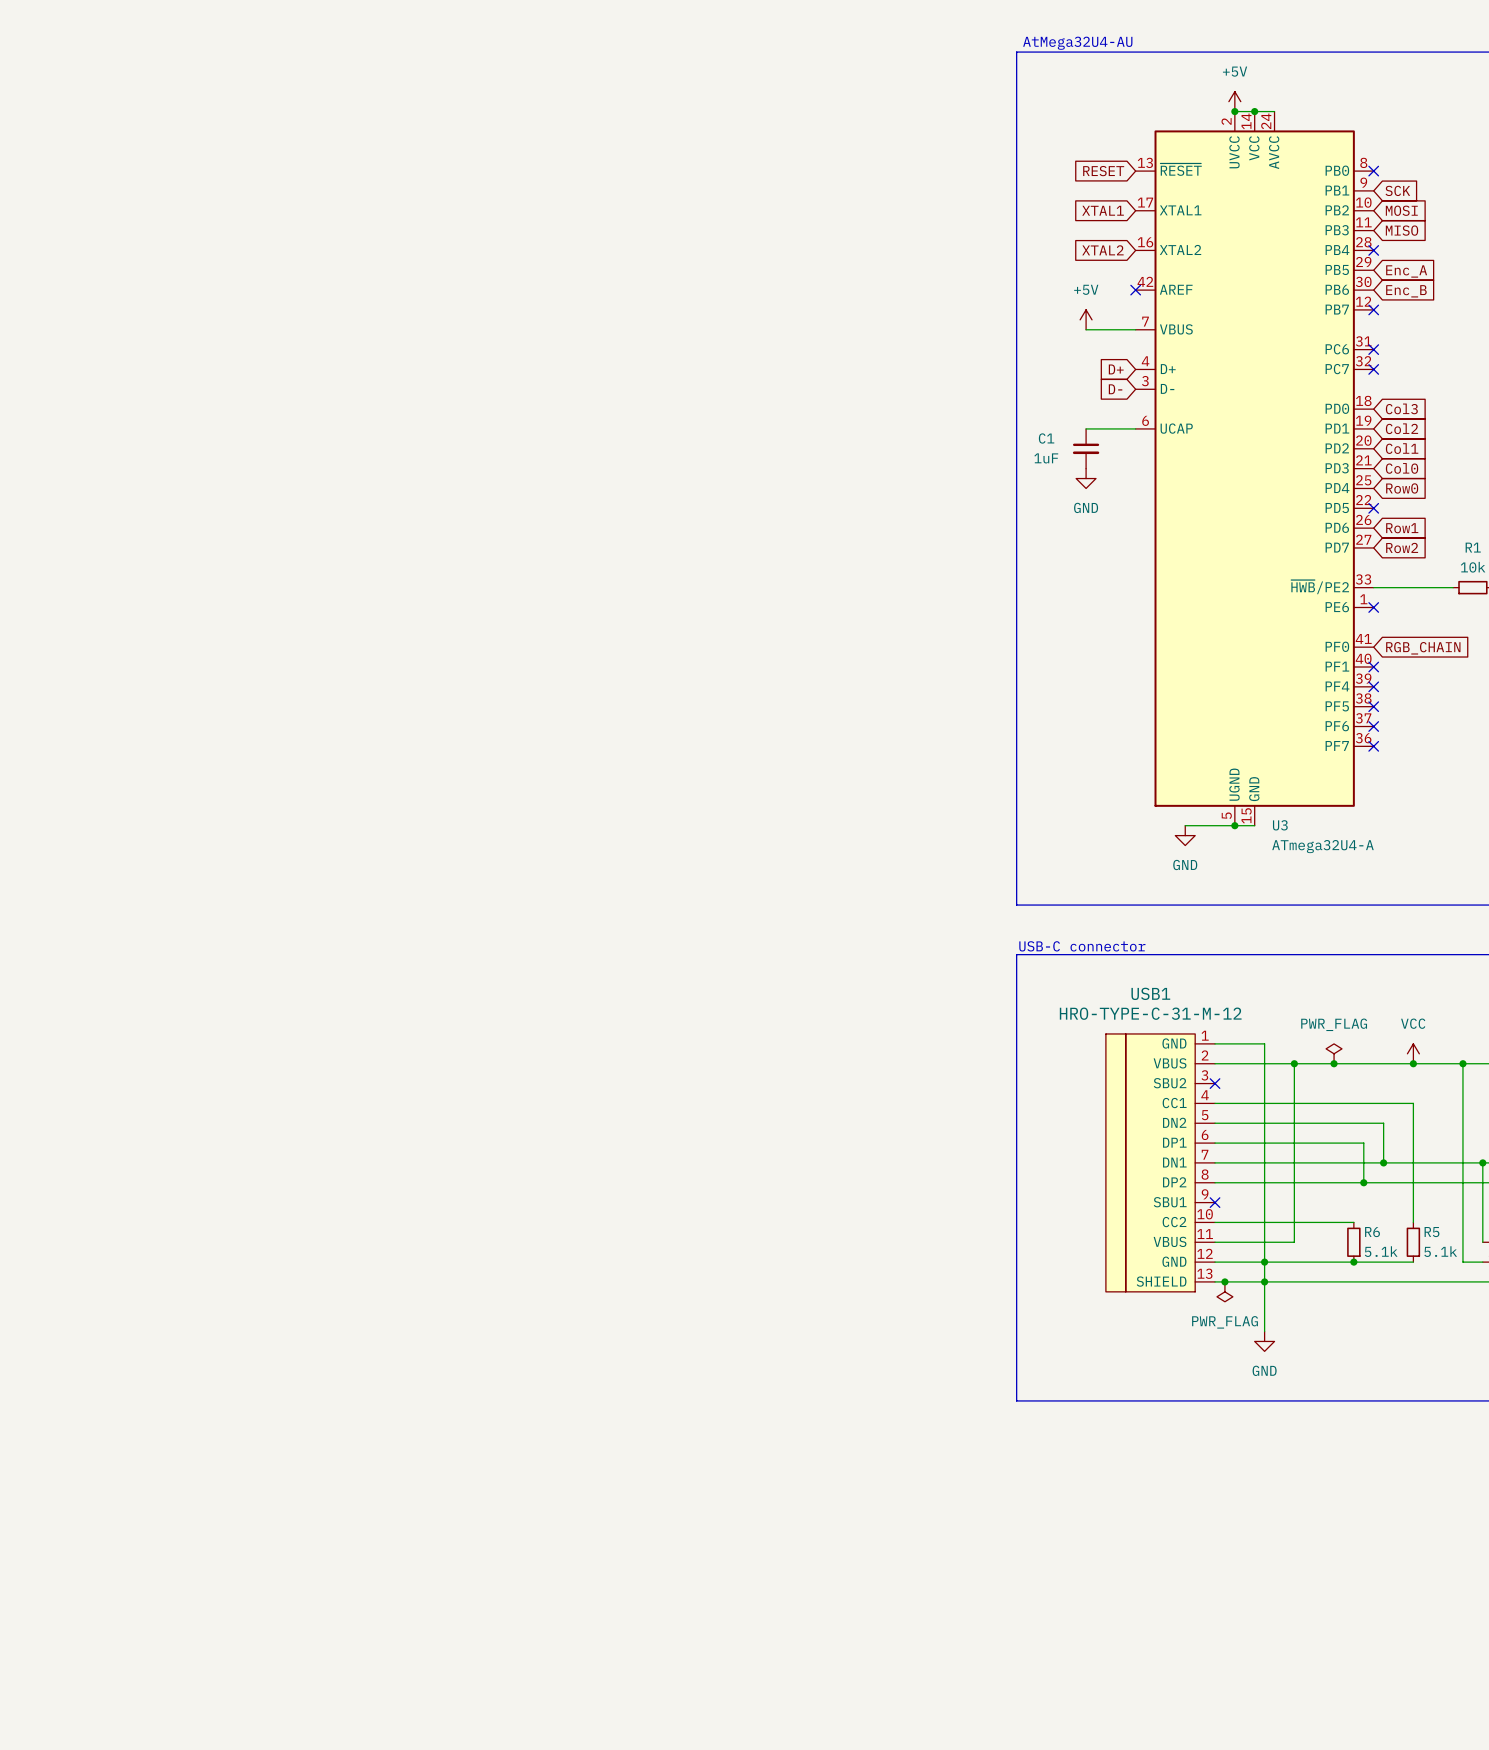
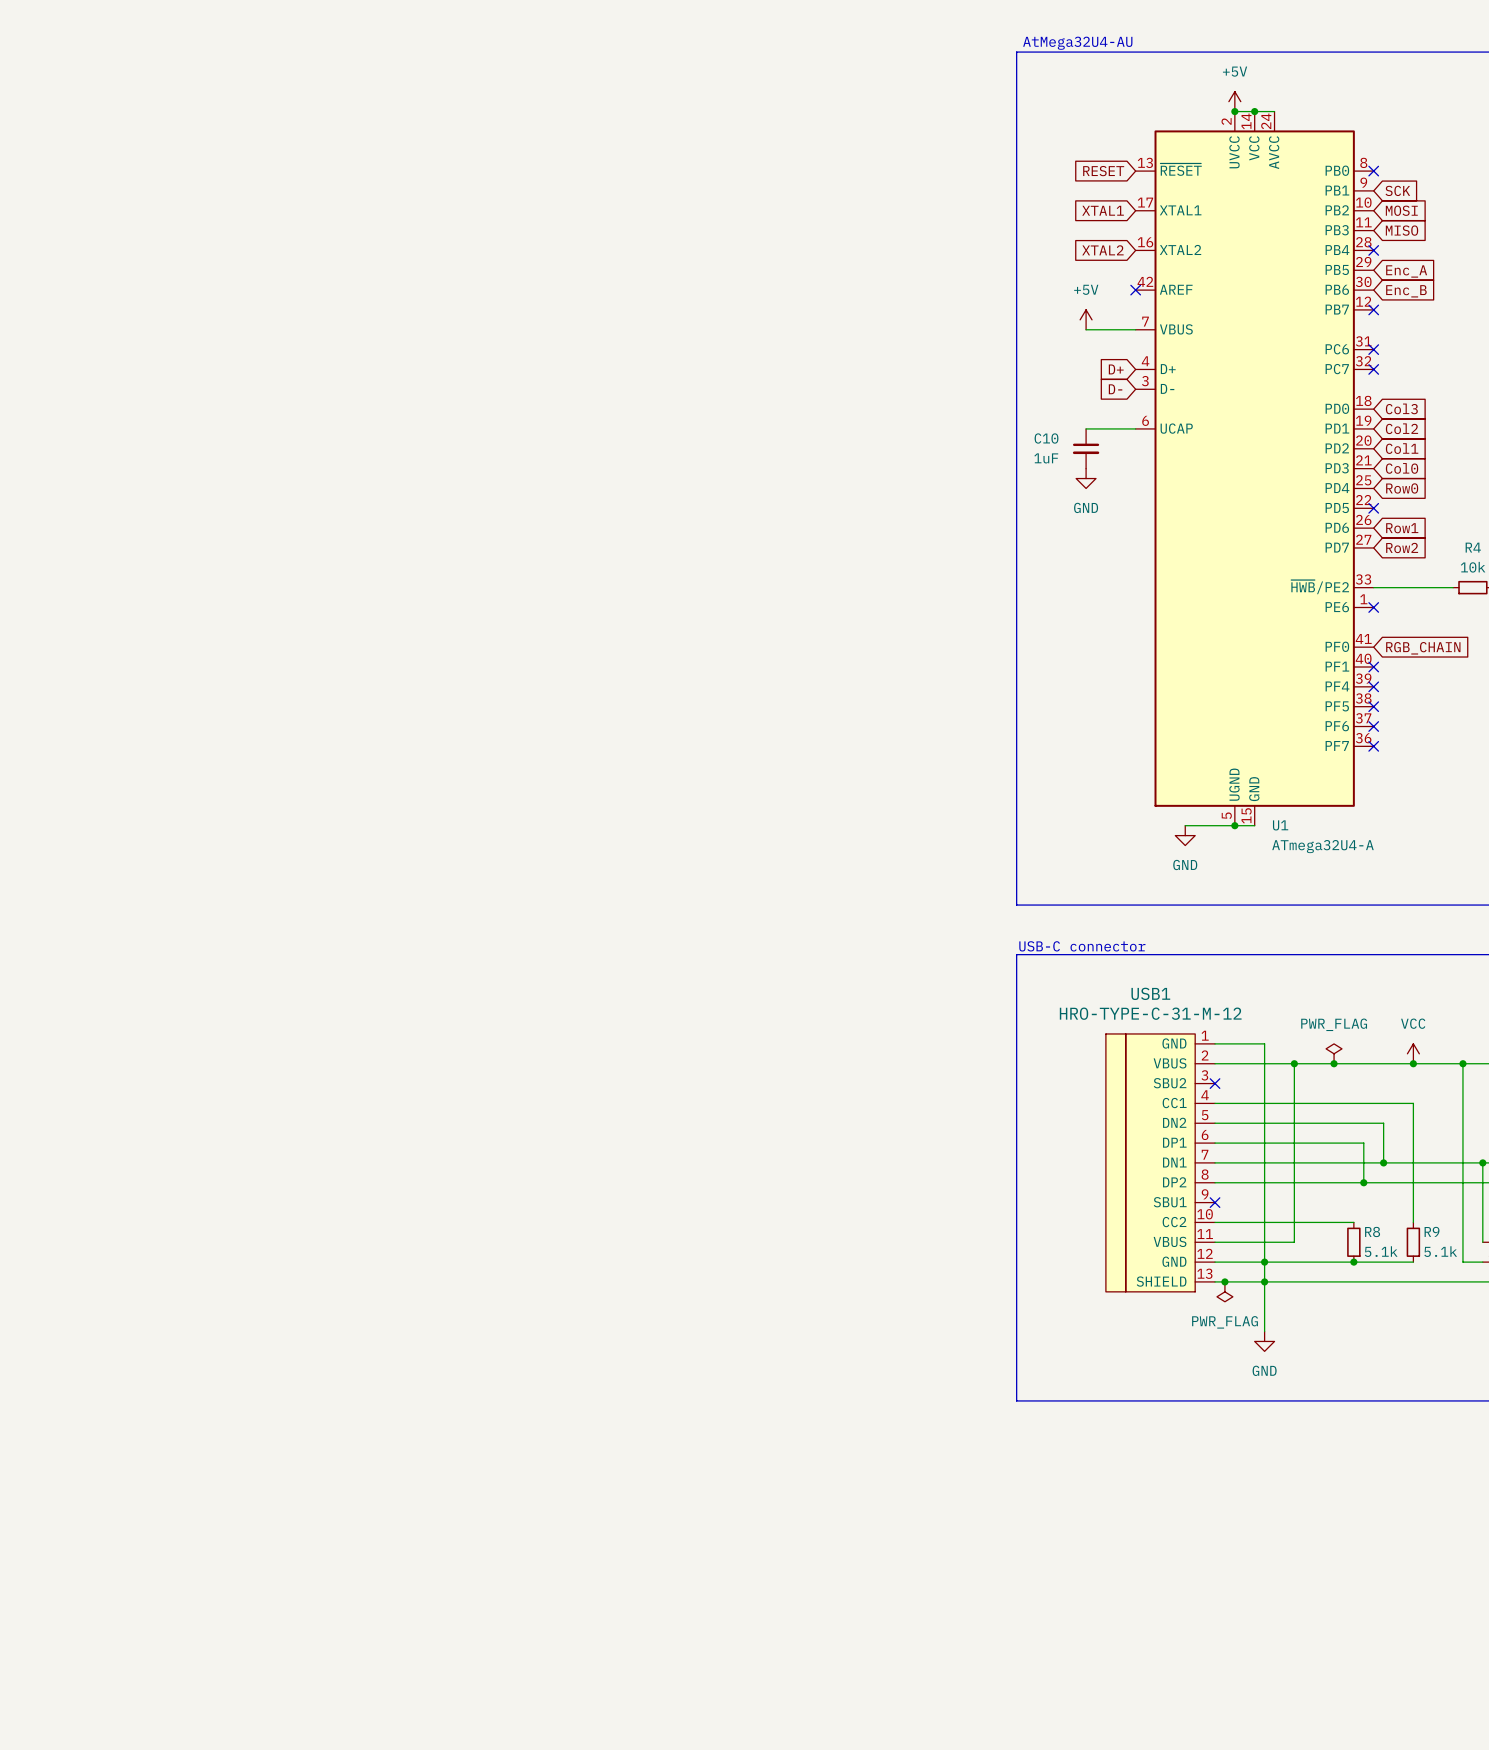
C1 name: C1 (1046, 438) -> C10 (1046, 438)
R1 name: R1 (1473, 547) -> R4 (1473, 547)
U3 name: U3 (1280, 825) -> U1 (1280, 825)
R6 name: R6 (1372, 1232) -> R8 (1372, 1231)
R5 name: R5 (1431, 1232) -> R9 (1432, 1231)

